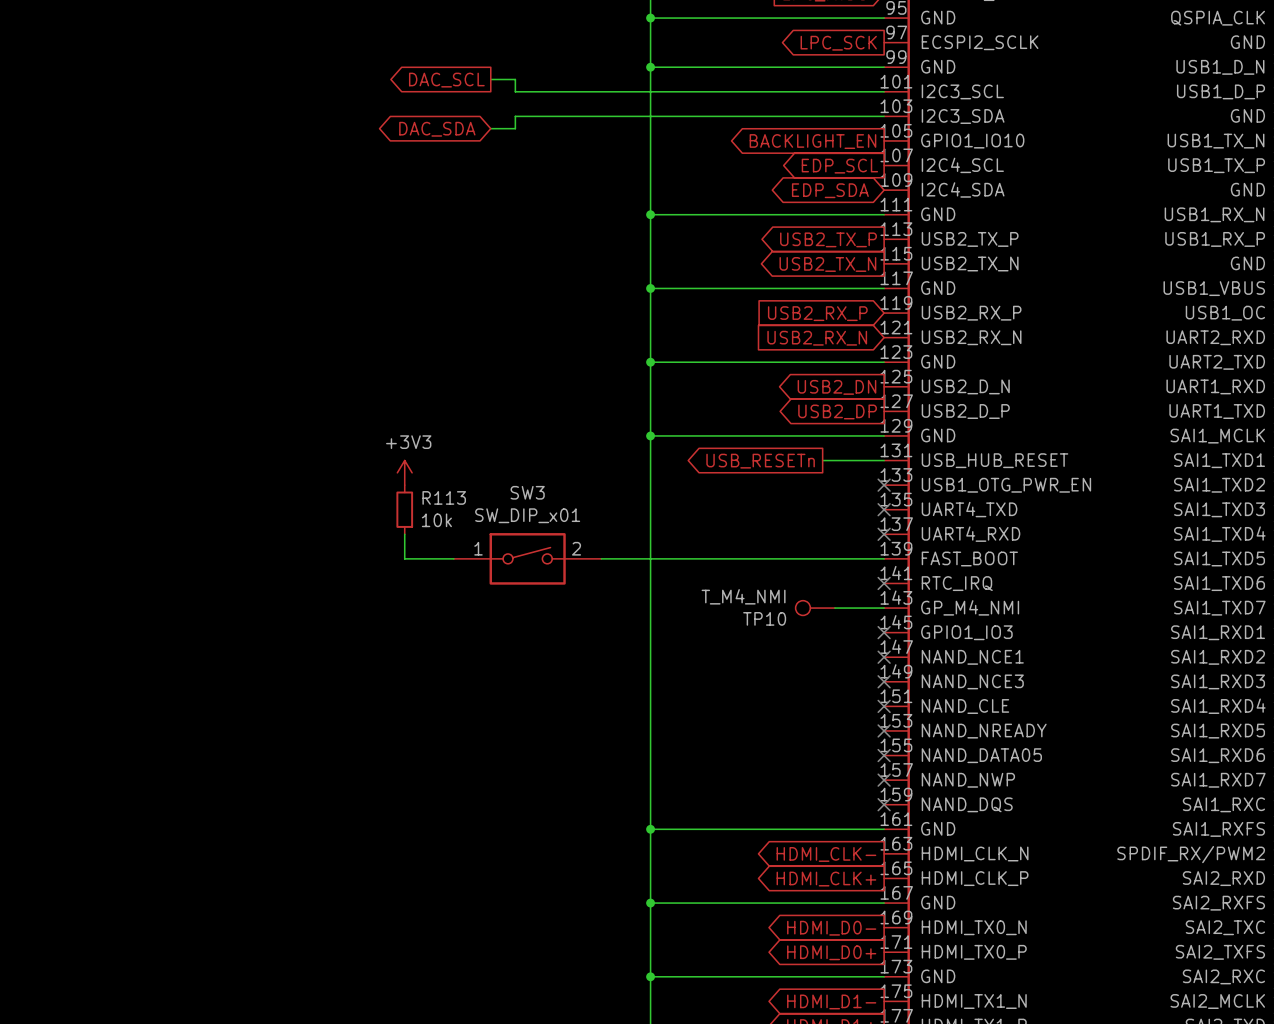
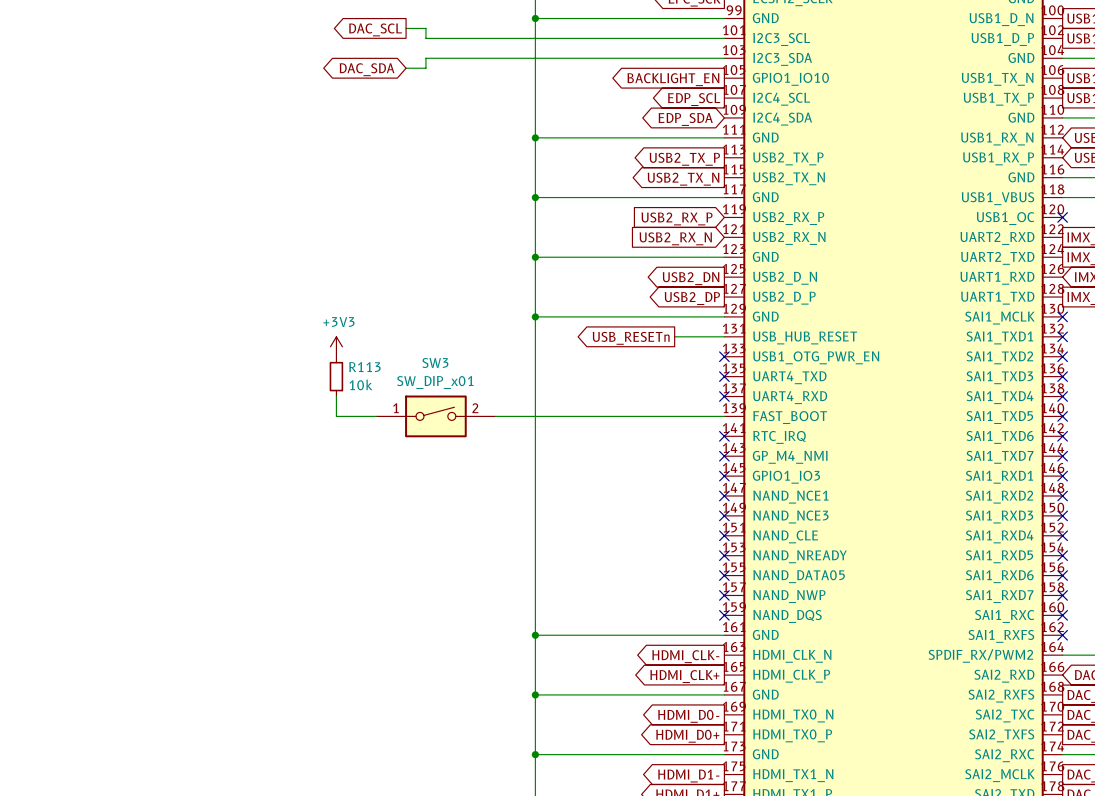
TP10: T_M4_NMI (815, 608) -> none
wire: (834, 608) (884, 608) -> none
no-connect mark: none -> (724, 456)

